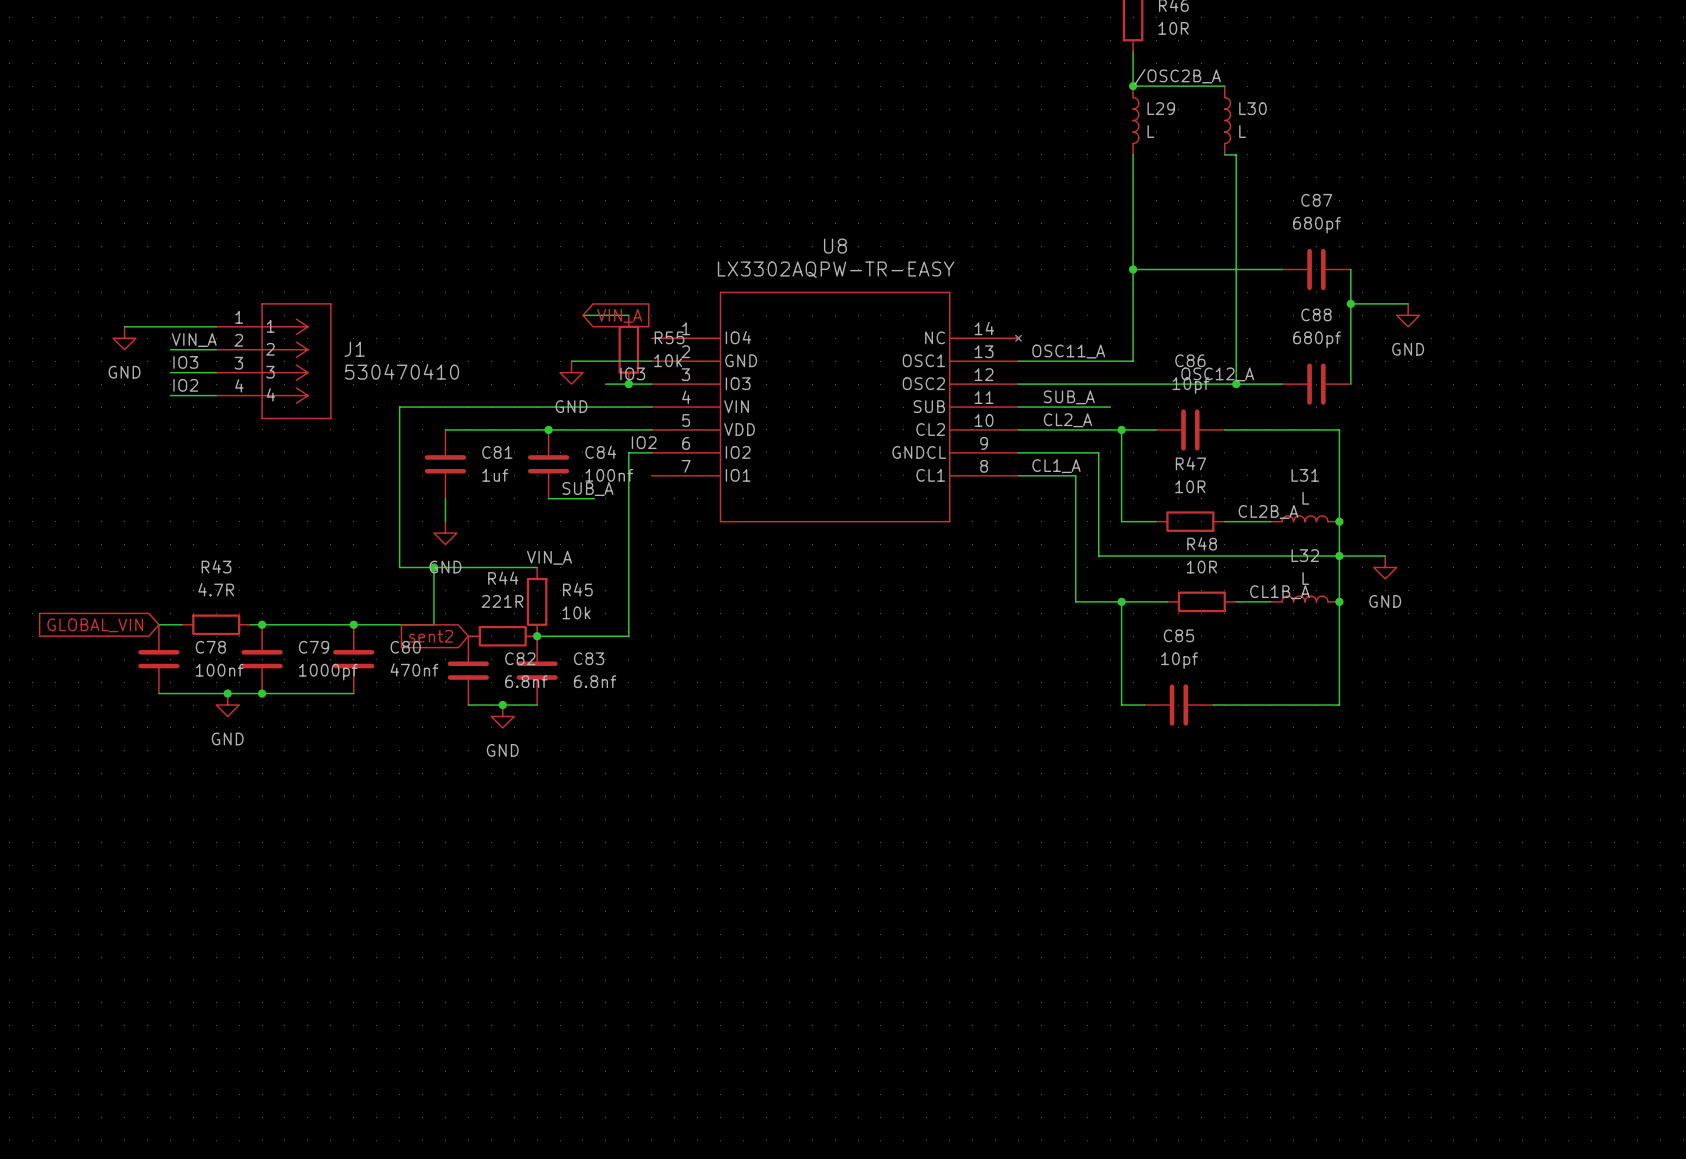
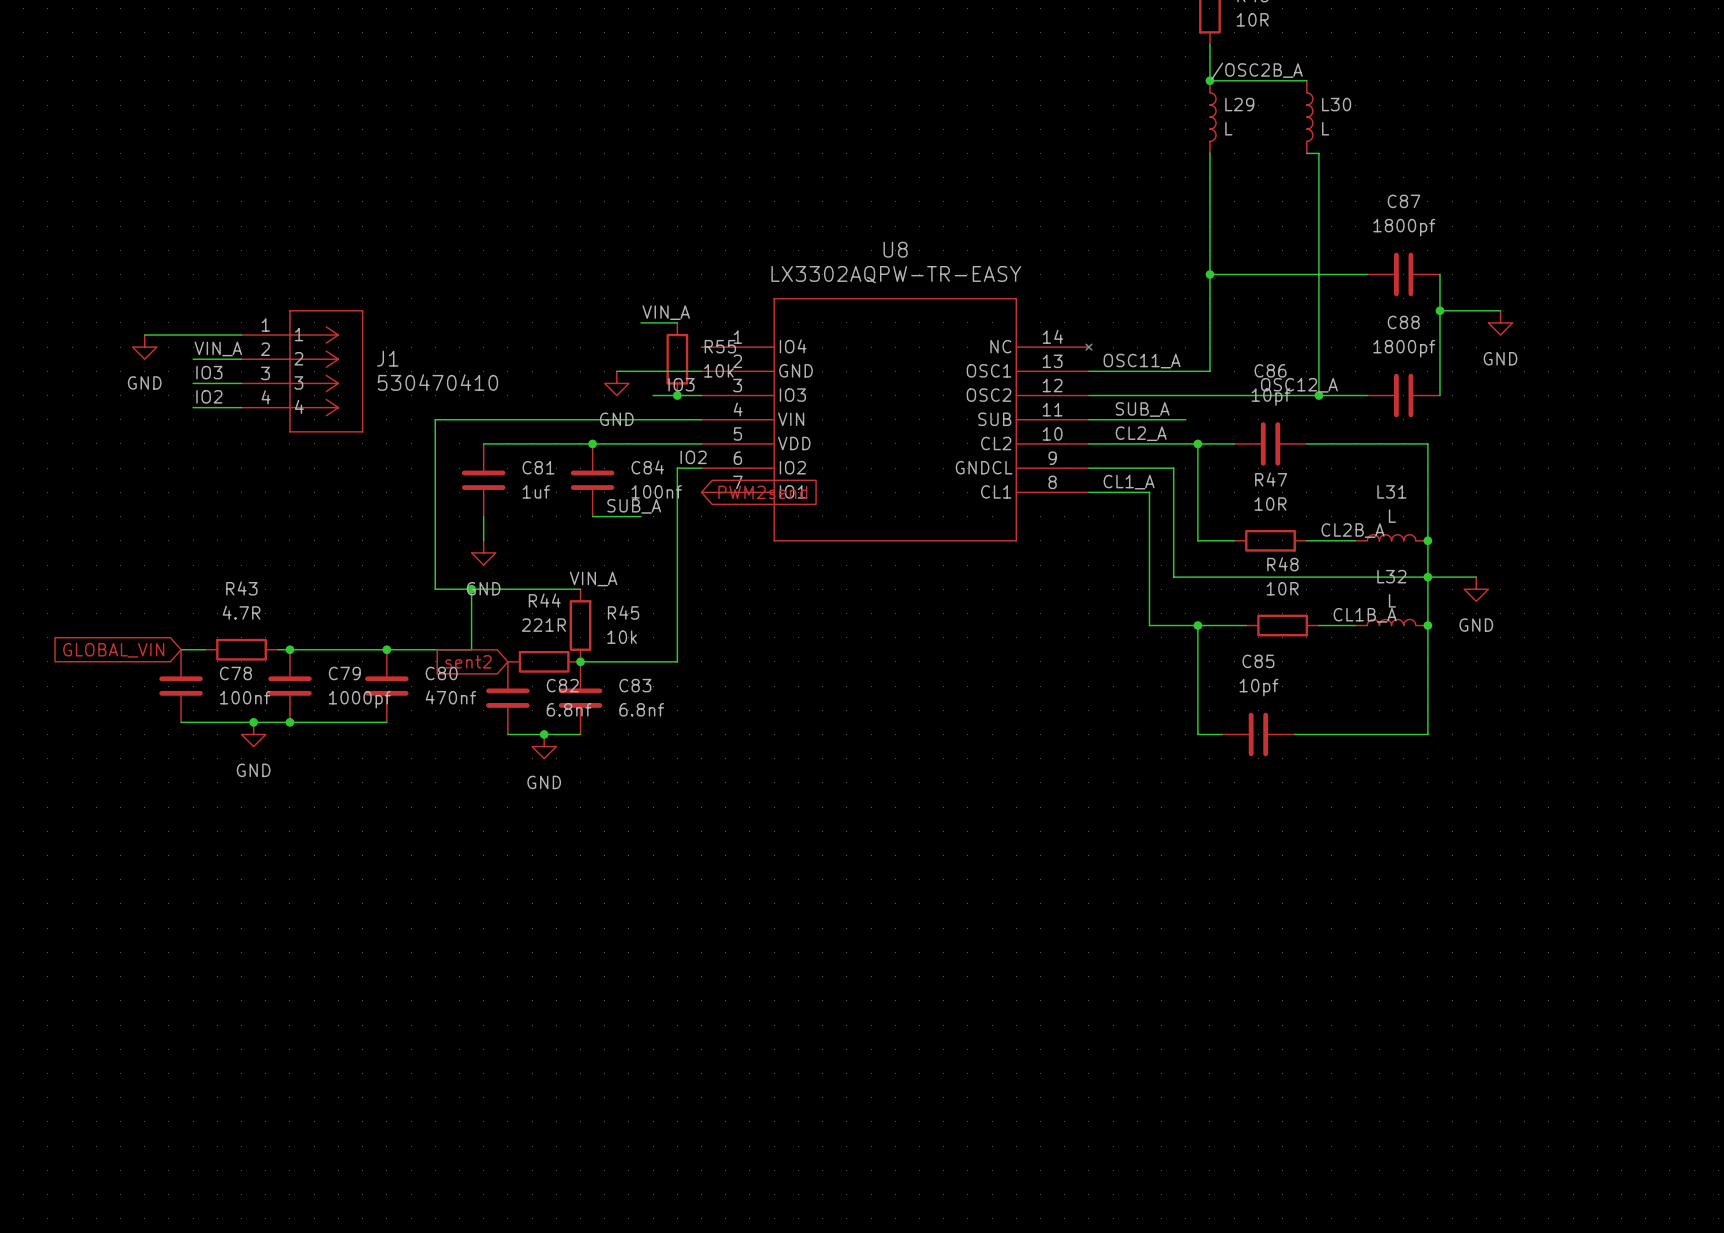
C87 value: 680pf (1317, 225) -> 1800pf (1404, 227)
label: none -> VIN_A (666, 312)
wire: (582, 315) (594, 315) -> none
global label: VIN_A (619, 315) -> none
C88 value: 680pf (1317, 339) -> 1800pf (1404, 348)
global label: none -> PWM2send (762, 492)

